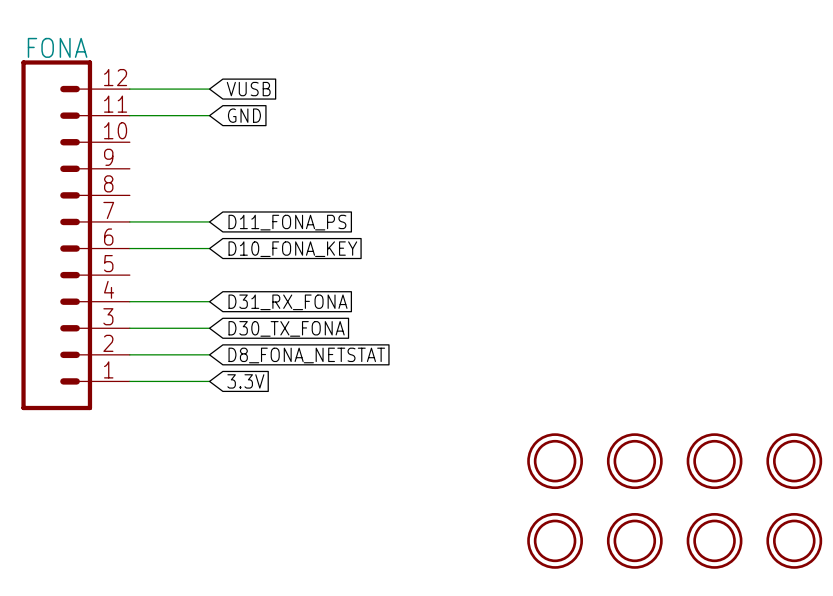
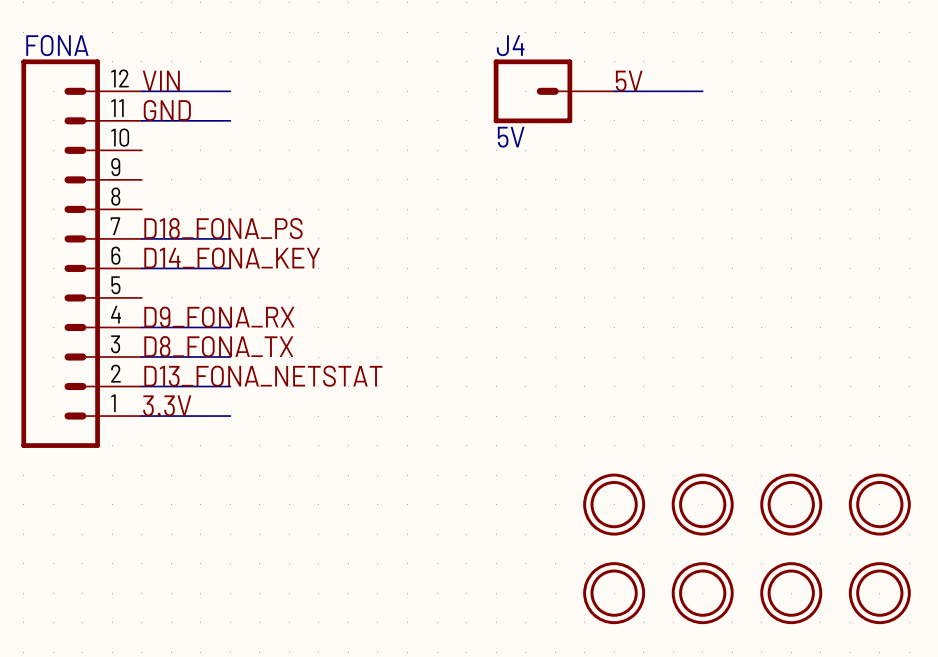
label: none -> VIN (161, 81)
label: none -> 5V (629, 81)
global label: VUSB (248, 89) -> none
J4: none -> 5V (553, 91)
wire: none -> (614, 91) (702, 91)
label: none -> GND (167, 110)
global label: GND (244, 115) -> none
label: none -> D18_FONA_PS (223, 228)
global label: D11_FONA_PS (287, 222) -> none
label: none -> D14_FONA_KEY (232, 258)
global label: D10_FONA_KEY (292, 249) -> none
label: none -> D9_FONA_RX (219, 317)
global label: D31_RX_FONA (288, 302) -> none
label: none -> D8_FONA_TX (218, 346)
global label: D30_TX_FONA (286, 328) -> none
label: none -> D13_FONA_NETSTAT (263, 376)
global label: D8_FONA_NETSTAT (306, 355) -> none
label: none -> 3.3V (167, 405)
global label: 3.3V (245, 381) -> none

